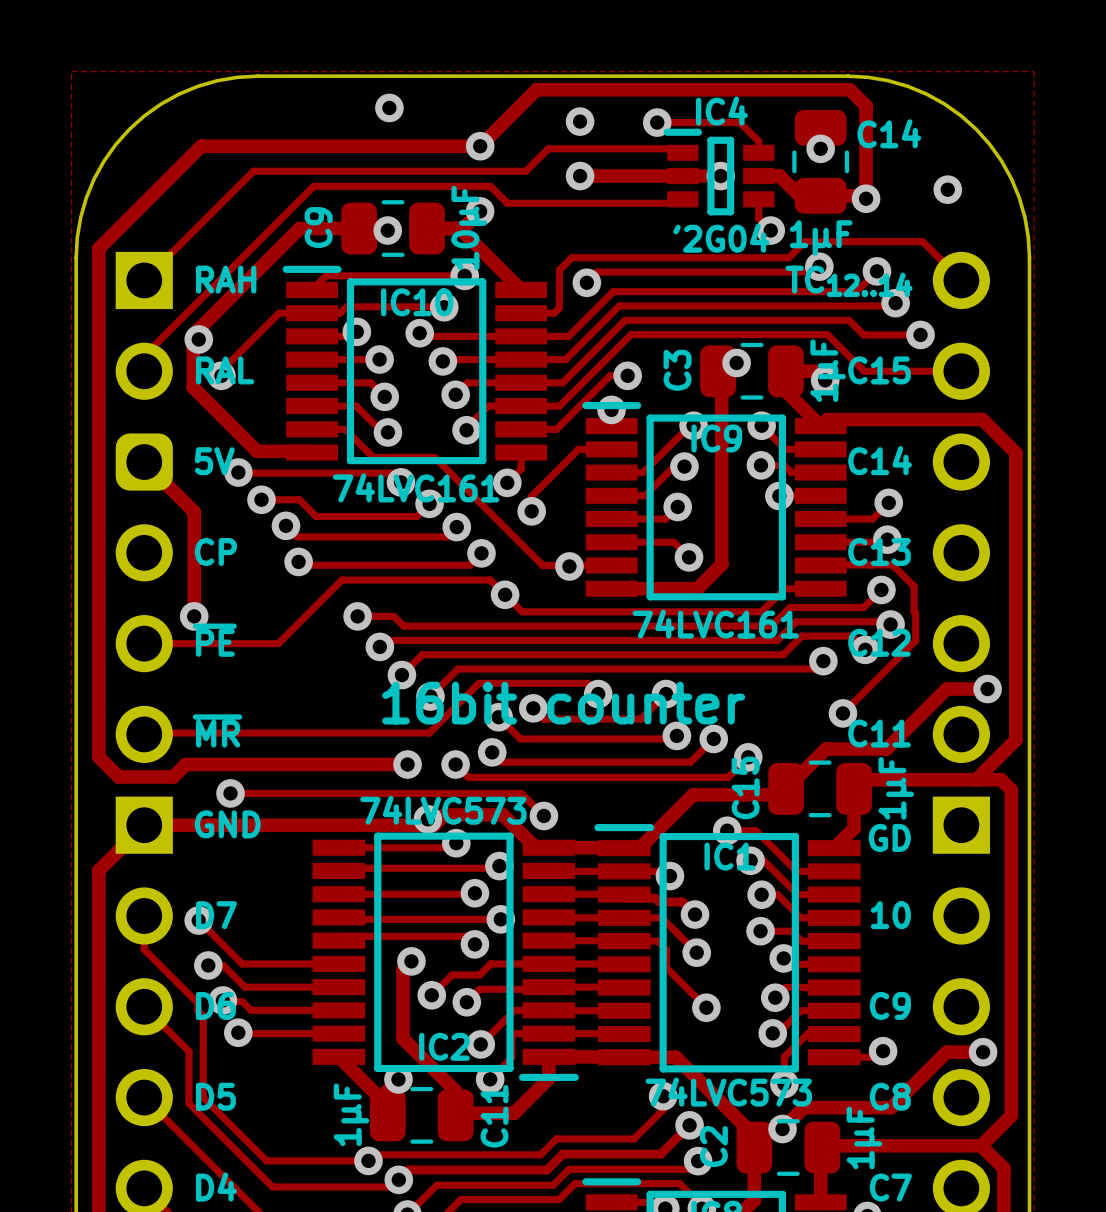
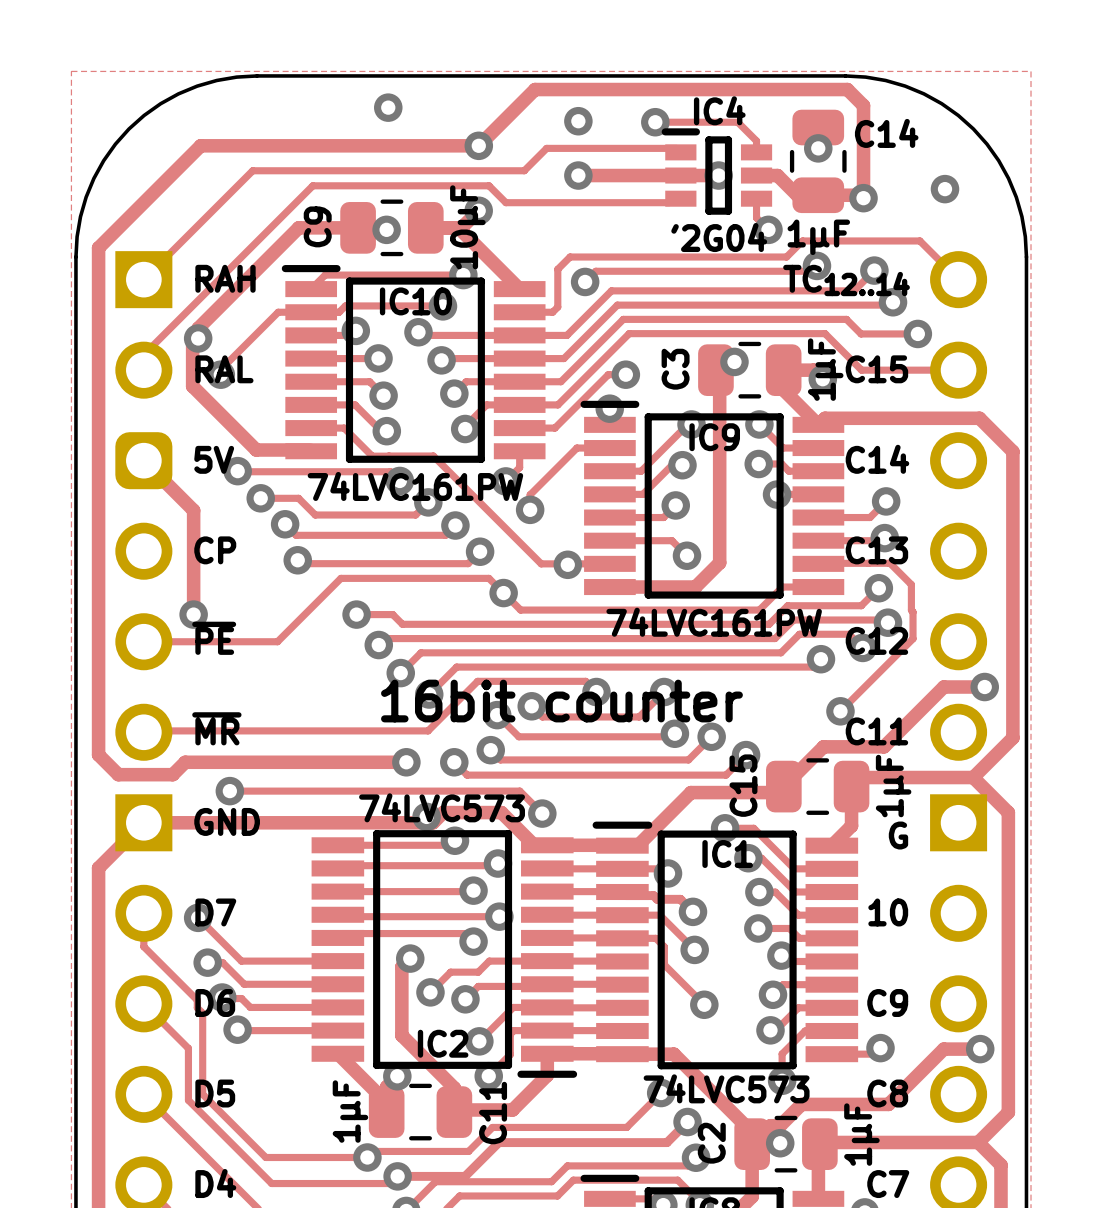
IC10 text: 74LVC161 (416, 487) -> 74LVC161PW (415, 486)
IC9 text: 74LVC161 (715, 624) -> 74LVC161PW (714, 622)
track: (976, 779) (1001, 779) (1011, 790) (1011, 814) -> (973, 777) (1008, 812)
text: GD (889, 837) -> G (898, 835)
track: (663, 1096) (663, 1109) (634, 1138) (556, 1138) (540, 1154) (469, 1154) -> (668, 1085) (626, 1127) (492, 1127) (468, 1151)
via position: (782, 1129) -> (780, 1143)
track: (668, 1145) (660, 1154) (562, 1154) (546, 1170) (408, 1170) (398, 1179) -> (666, 1142) (498, 1142) (465, 1176) (397, 1176)

